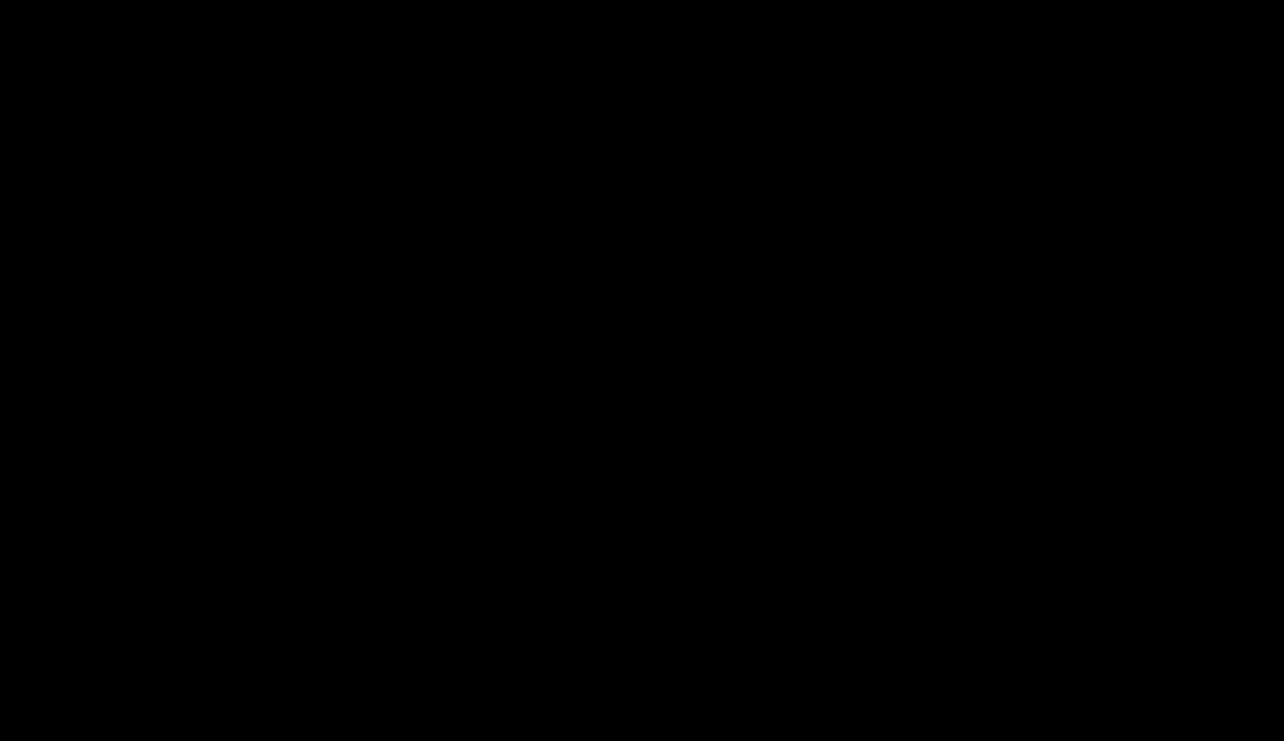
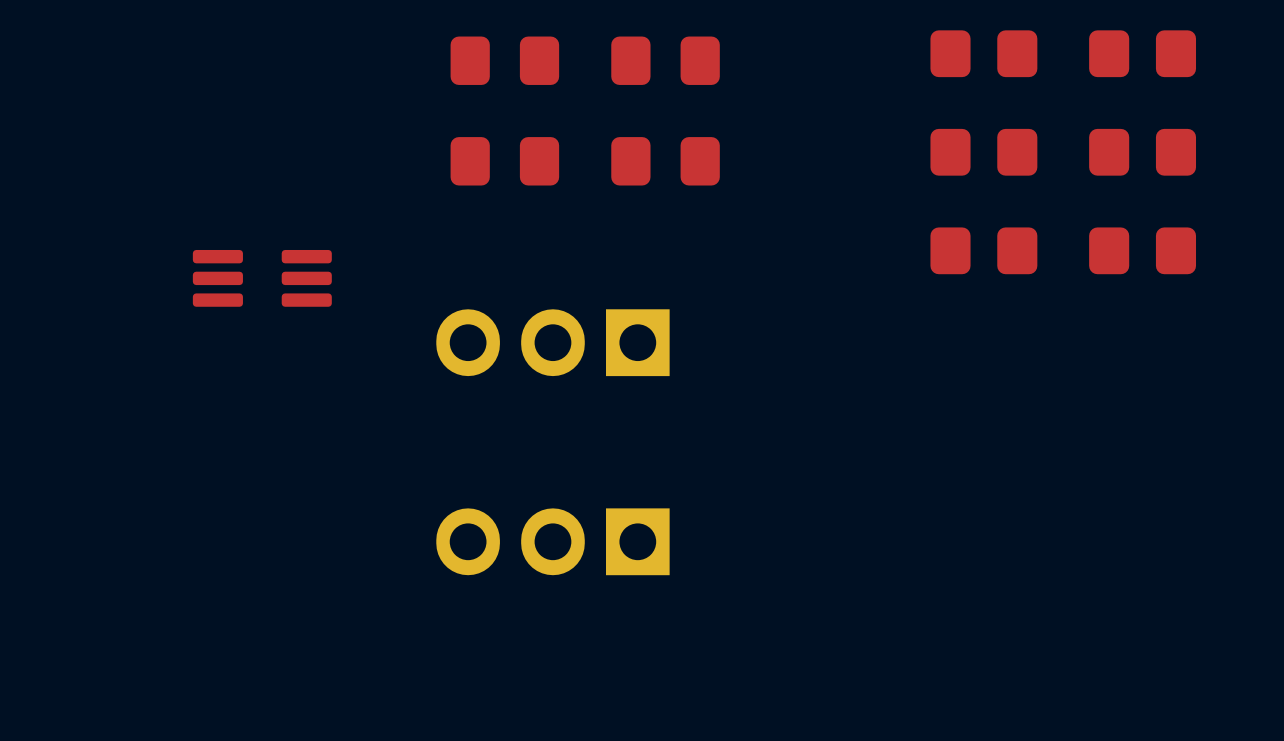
part: none -> (983, 53)
part: none -> (1142, 53)
part: none -> (504, 60)
part: none -> (665, 60)
part: none -> (983, 152)
part: none -> (1142, 152)
part: none -> (504, 161)
part: none -> (665, 161)
part: none -> (983, 250)
part: none -> (1142, 250)
part: none -> (262, 278)
part: none -> (552, 342)
part: none -> (552, 541)

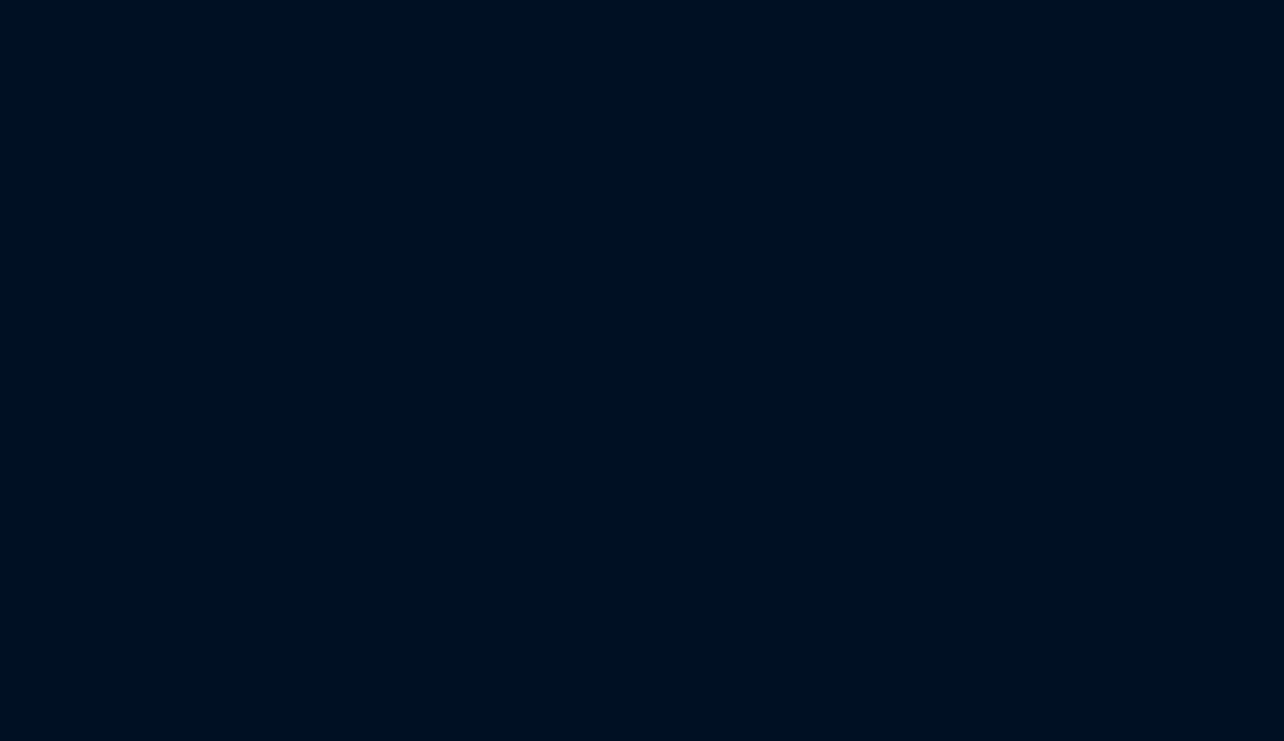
part: (983, 53) -> none
part: (1142, 53) -> none
part: (504, 60) -> none
part: (665, 60) -> none
part: (983, 152) -> none
part: (1142, 152) -> none
part: (504, 161) -> none
part: (665, 161) -> none
part: (983, 250) -> none
part: (1142, 250) -> none
part: (262, 278) -> none
part: (552, 342) -> none
part: (552, 541) -> none

